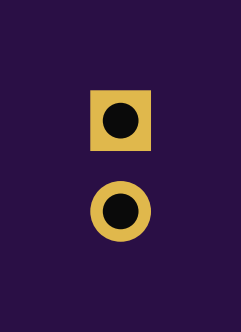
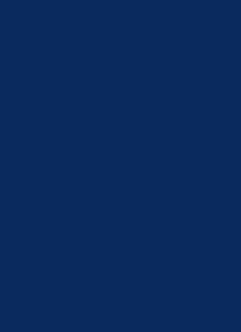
part: (120, 166) -> none

